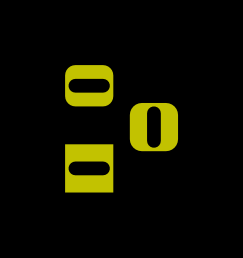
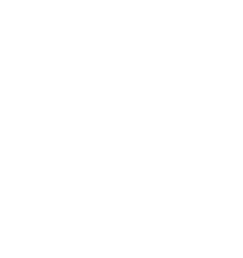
part: (121, 128) -> none

